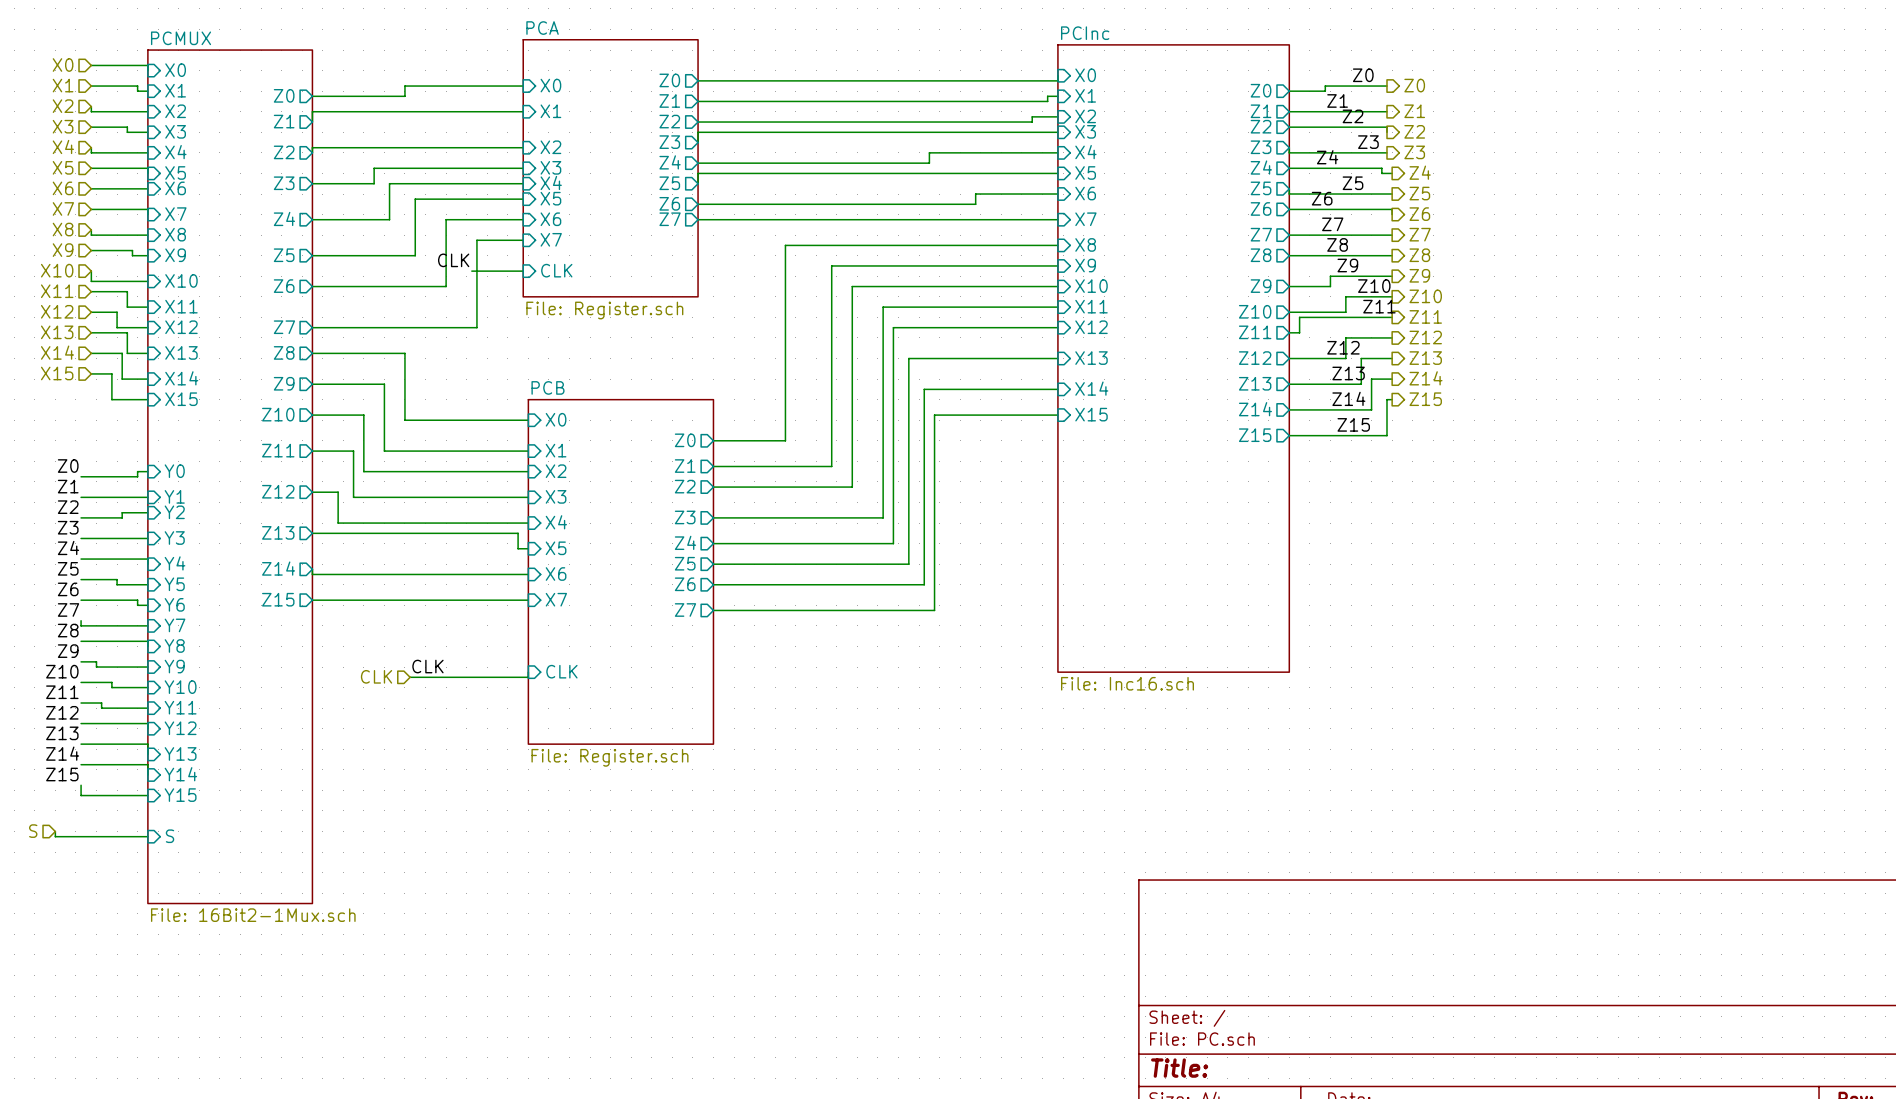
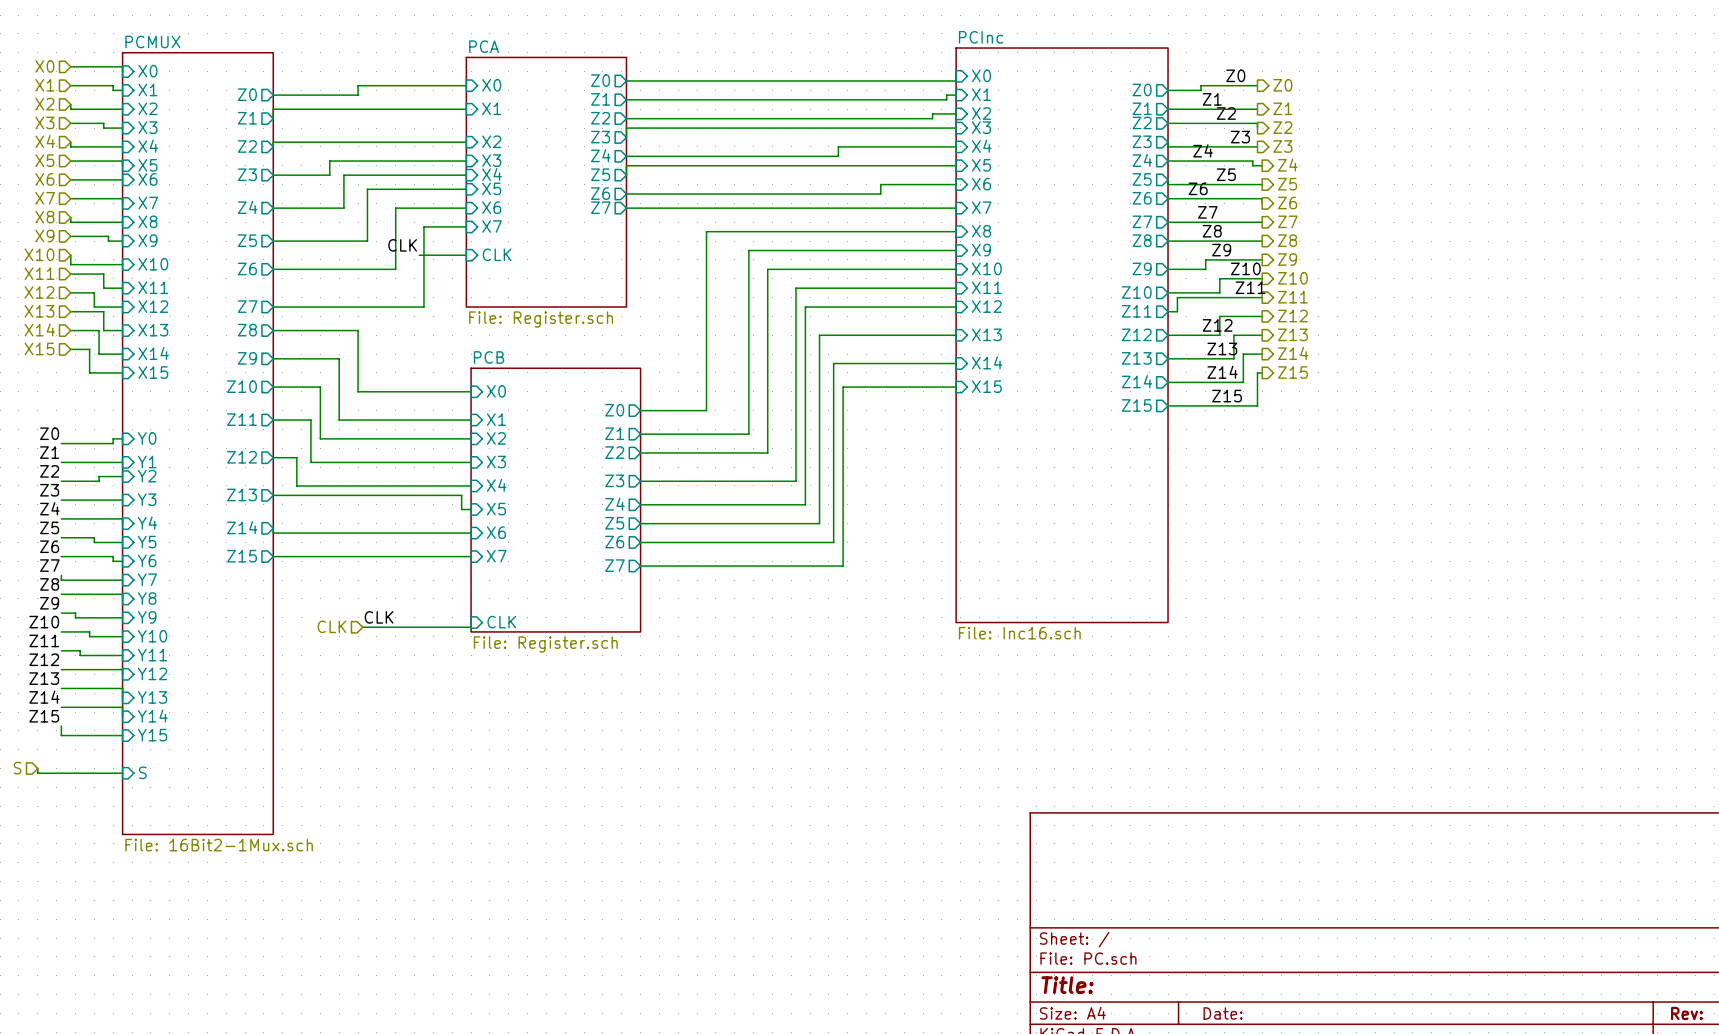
sheet PCA: File: Register.sch (610, 168) -> none
sheet PCA: none -> File: Register.sch (546, 182)
sheet PCB: none -> File: Register.sch (555, 500)
sheet PCB: File: Register.sch (620, 571) -> none

